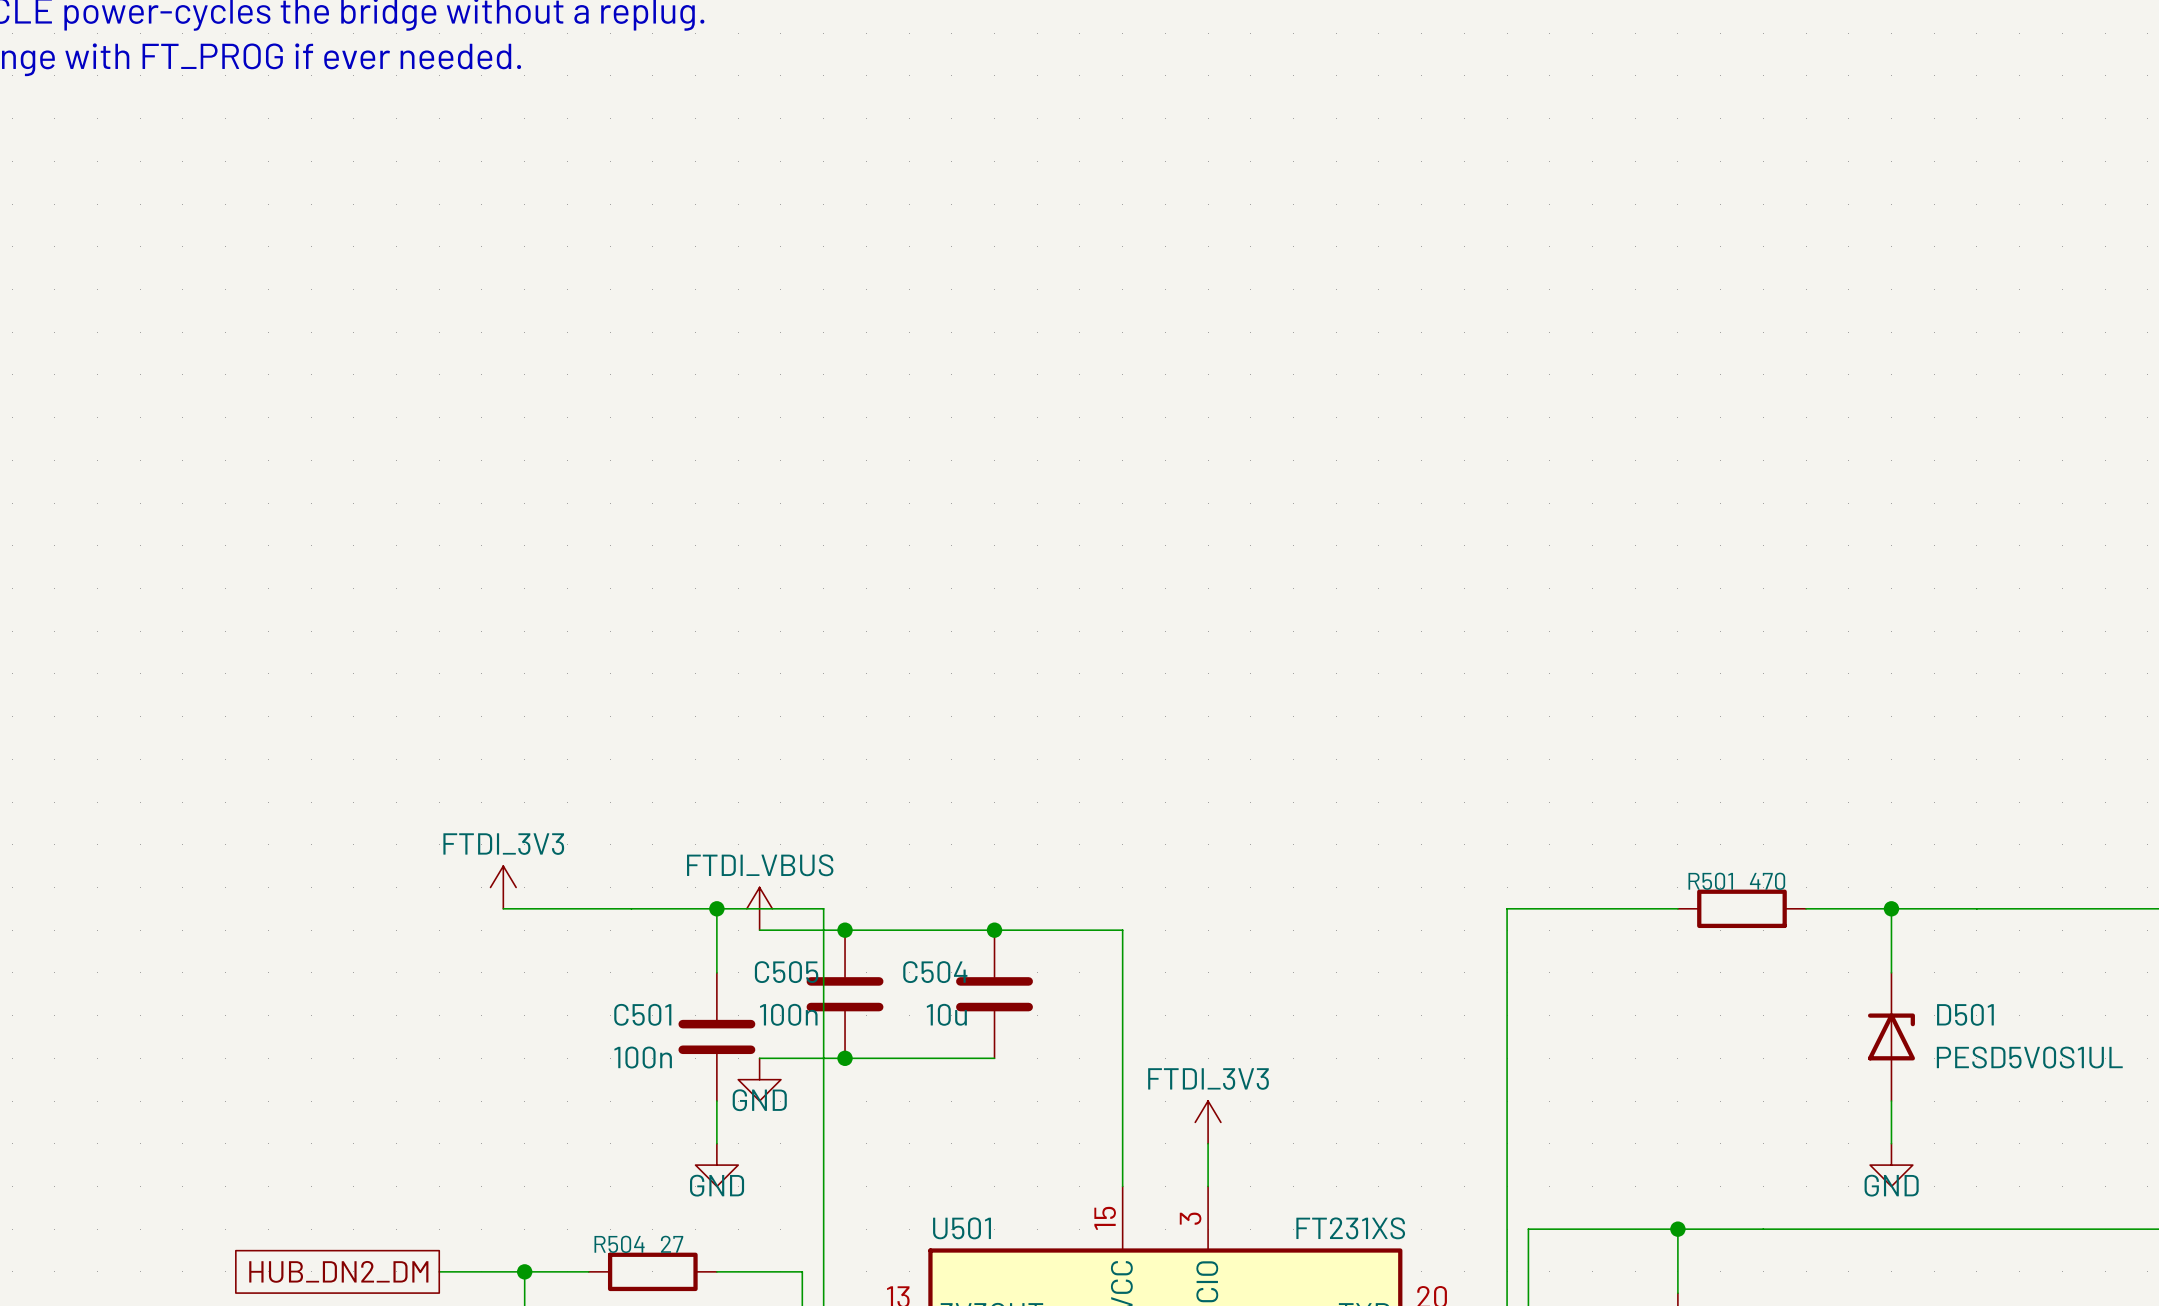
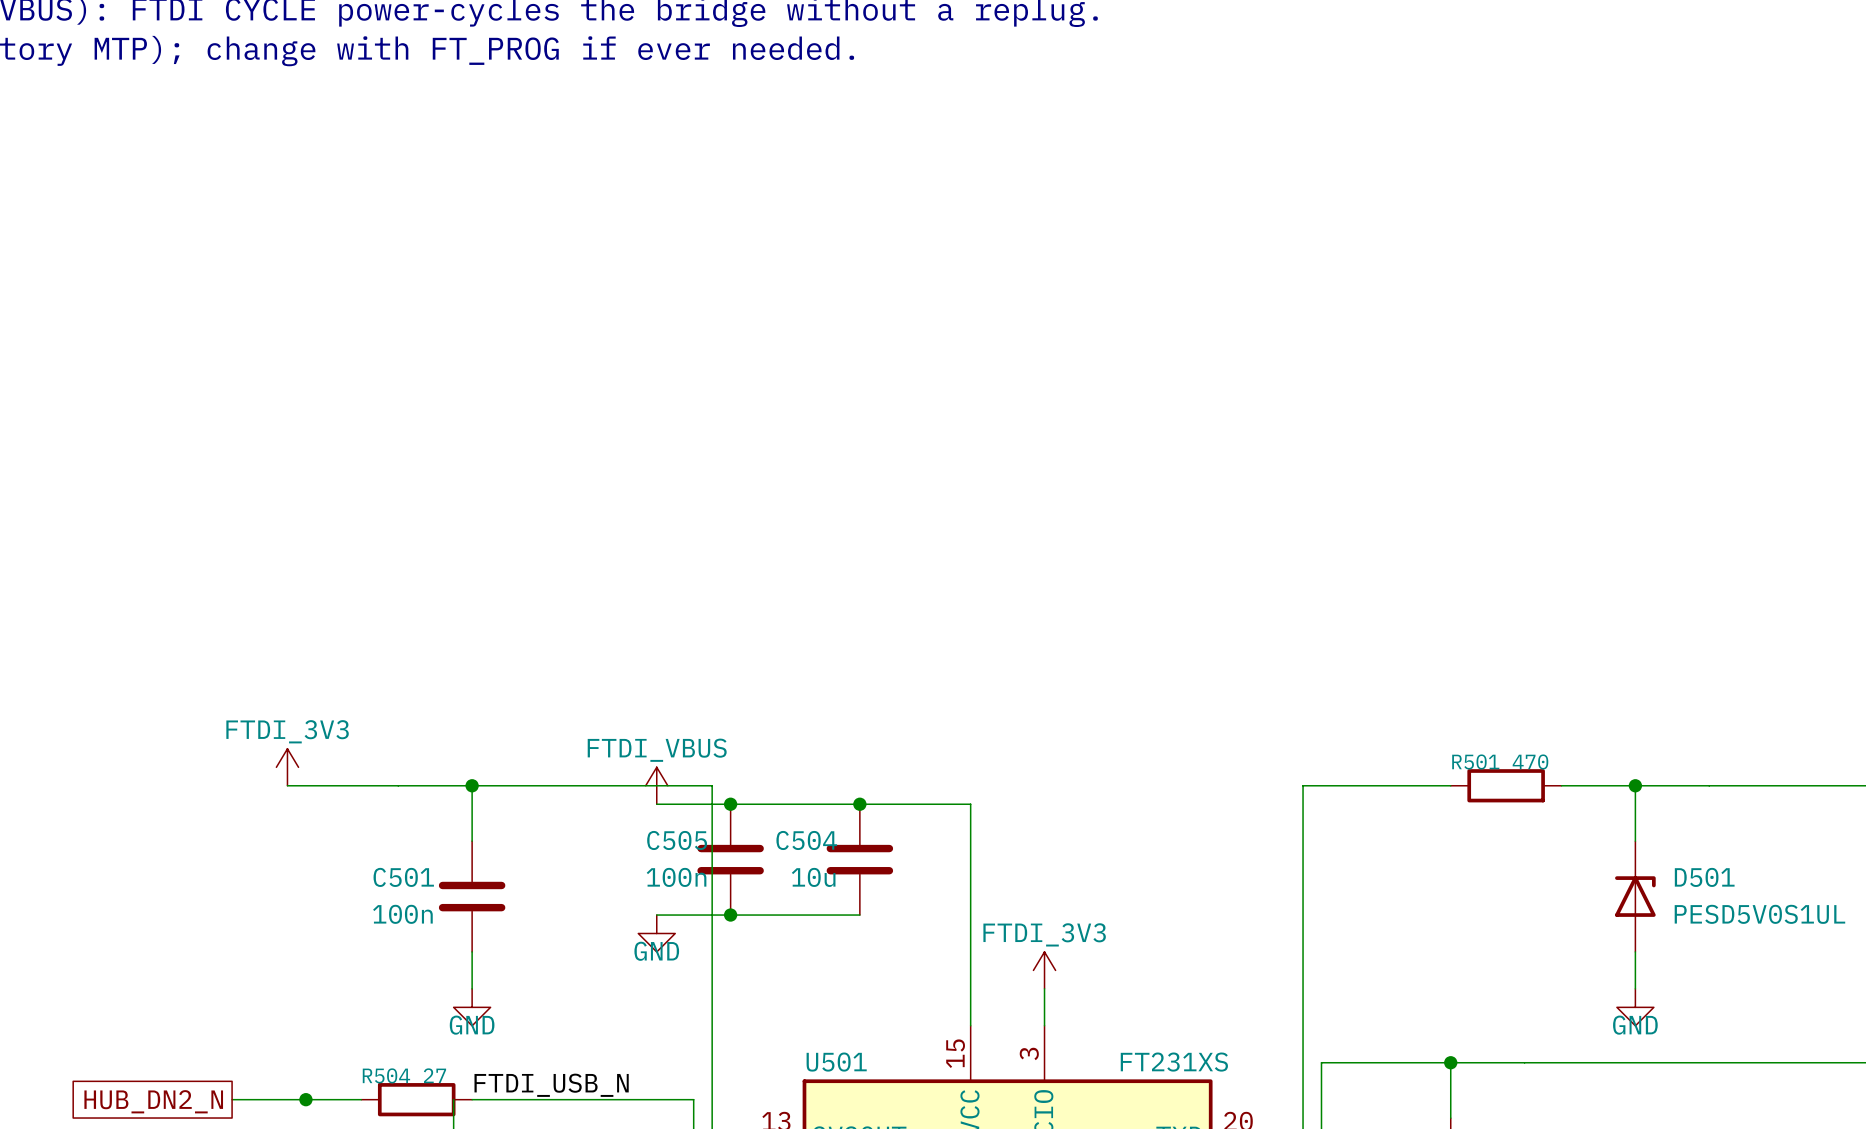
power symbol position: FTDI_3V3 (503, 887) -> FTDI_3V3 (287, 767)
wire: none -> (287, 785) (435, 785)
junction: none -> (472, 785)
wire: (716, 908) (716, 972) -> (472, 785) (472, 841)
junction: (716, 908) -> none
C501 position: (716, 1036) -> (472, 896)
wire: (716, 1101) (716, 1143) -> (472, 951) (472, 988)
power symbol position: GND (716, 1165) -> GND (472, 1007)
label: none -> FTDI_USB_N (551, 1085)
wire: none -> (232, 1099) (361, 1099)
global label: HUB_DN2_DM (338, 1271) -> HUB_DN2_N (153, 1101)
junction: none -> (305, 1099)
wire: (439, 1271) (546, 1271) -> none
junction: (524, 1271) -> none
wire: none -> (509, 1099) (619, 1099)
R504 position: (652, 1271) -> (416, 1099)

